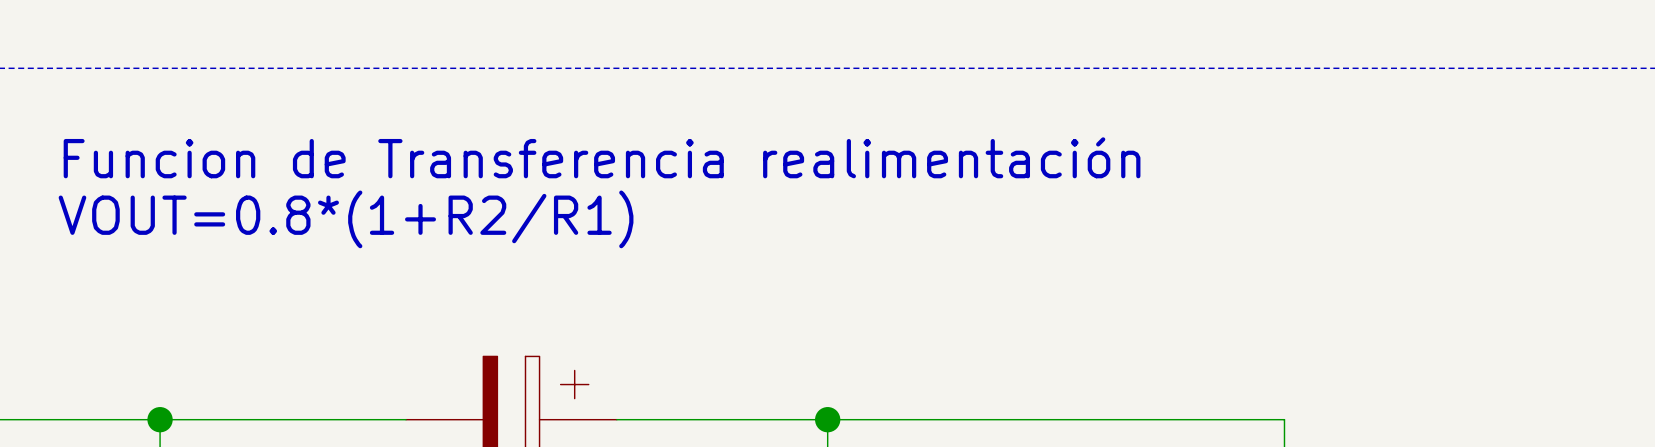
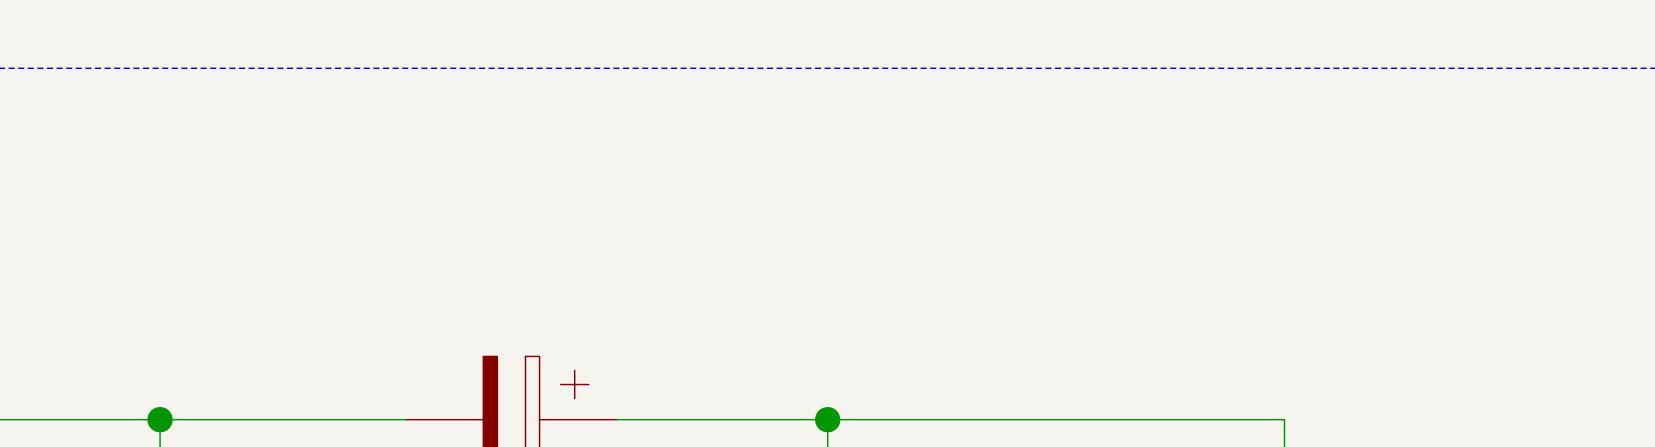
text: Funcion de Transferencia realimentación (602, 157) -> none
text: VOUT=0.8*(1+R2/R1) (346, 219) -> none

